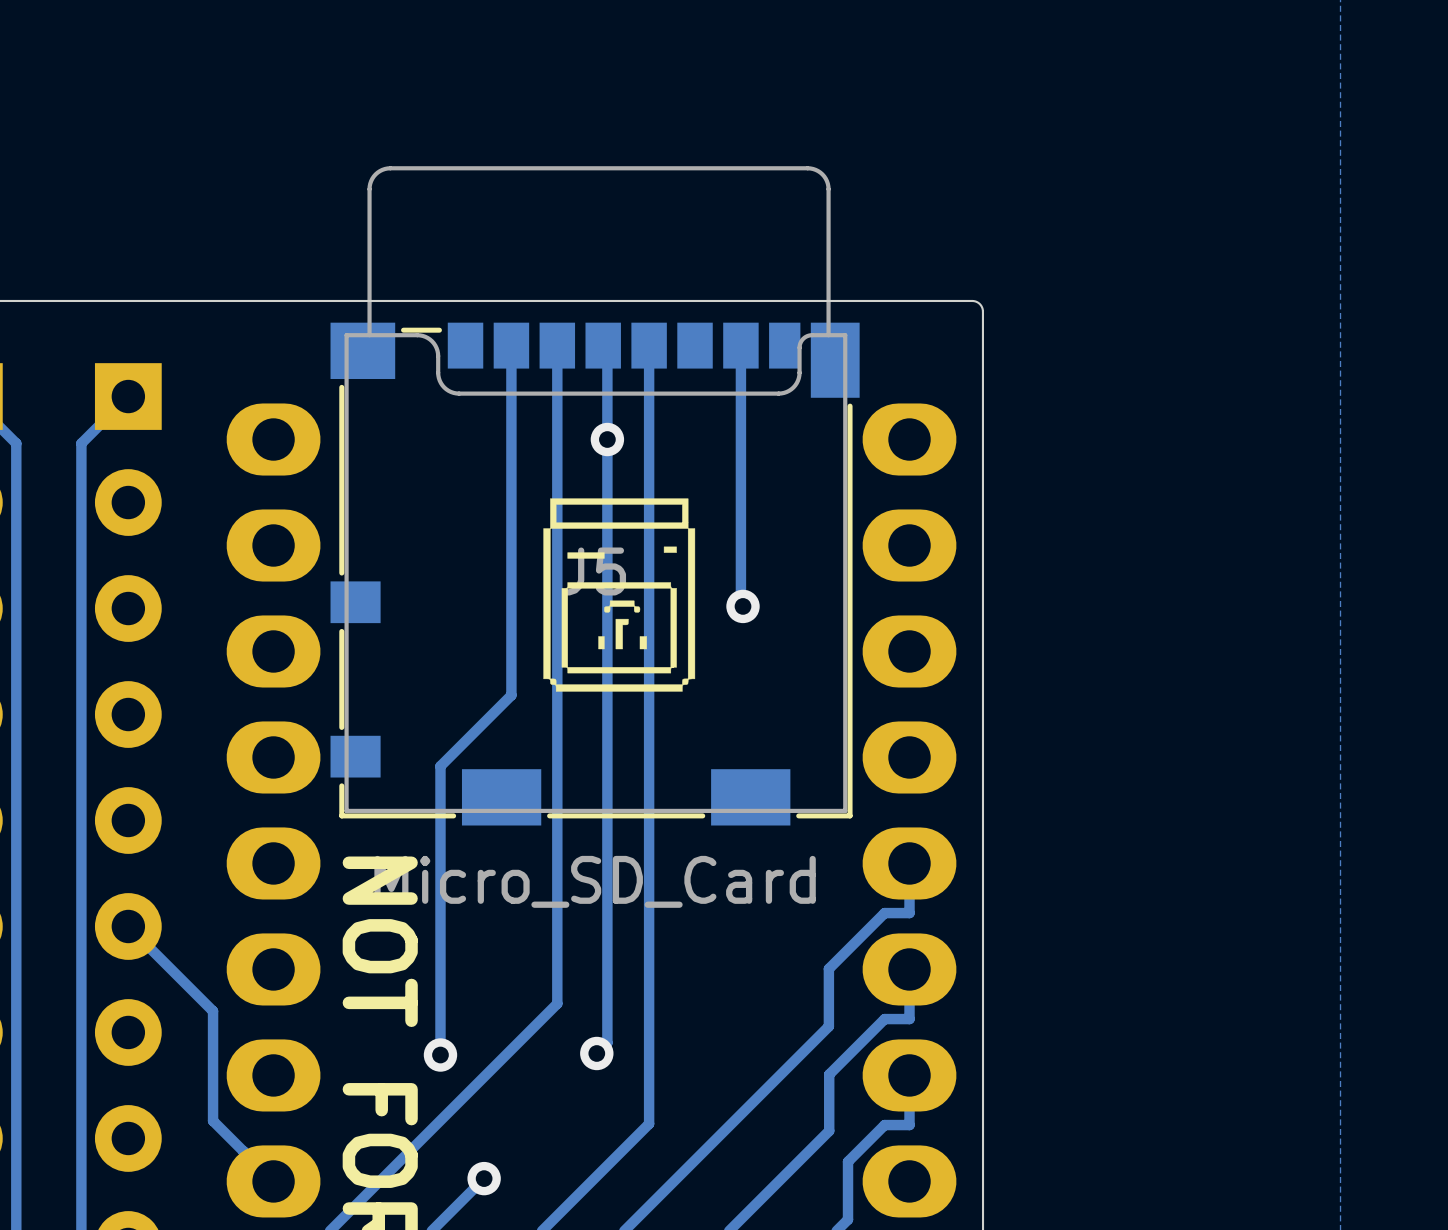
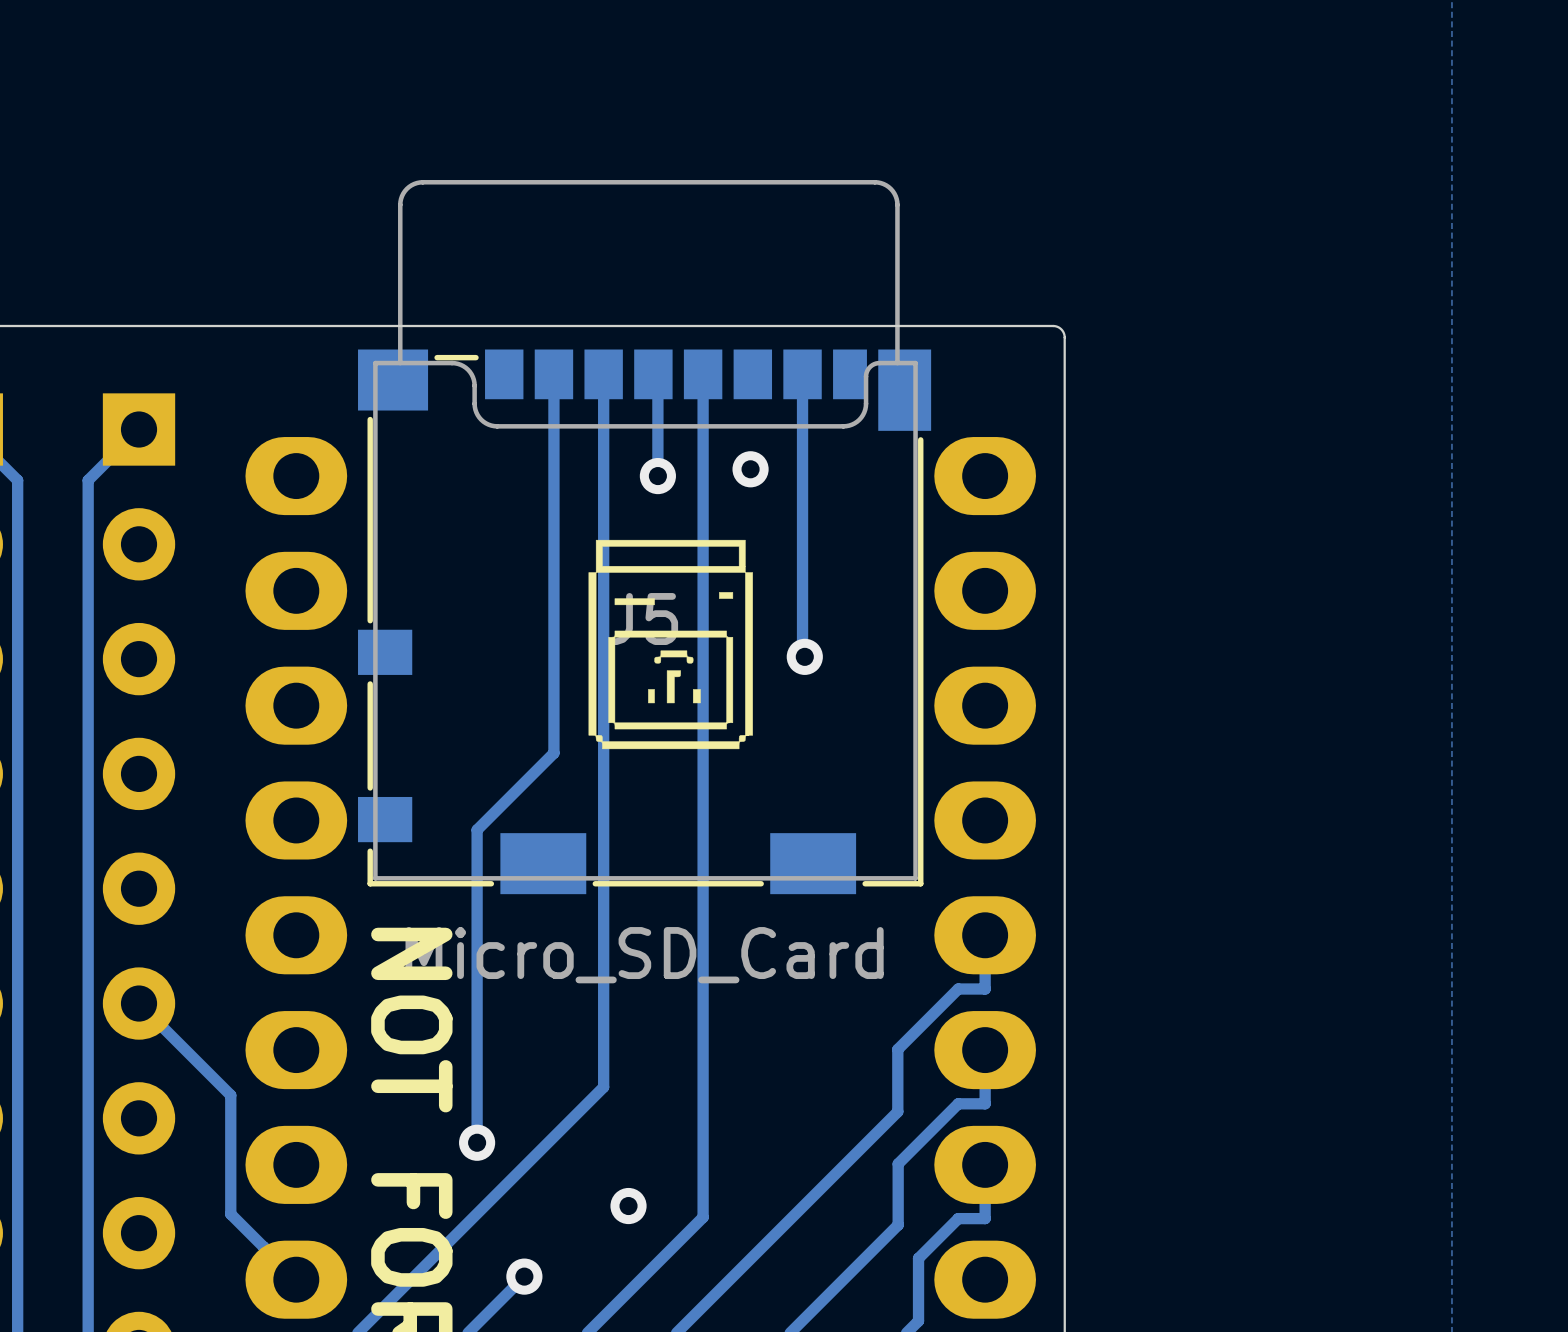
via: none -> (750, 469)
track: (607, 439) (607, 1042) (596, 1053) -> none
via position: (596, 1053) -> (628, 1206)

